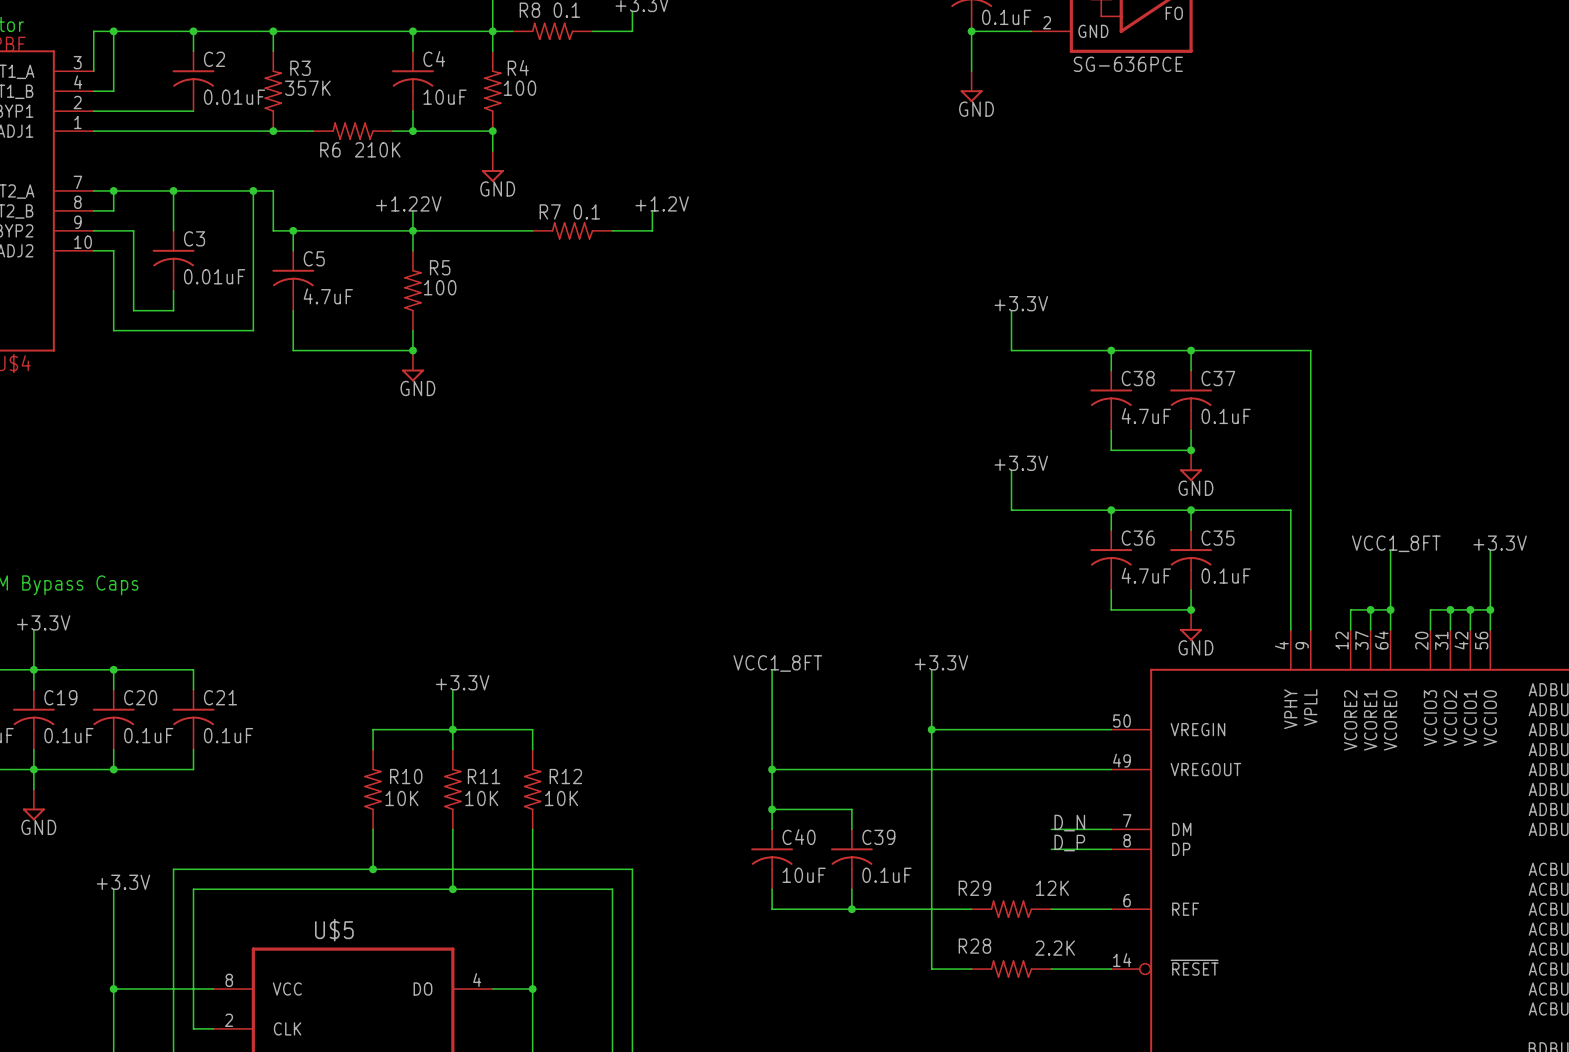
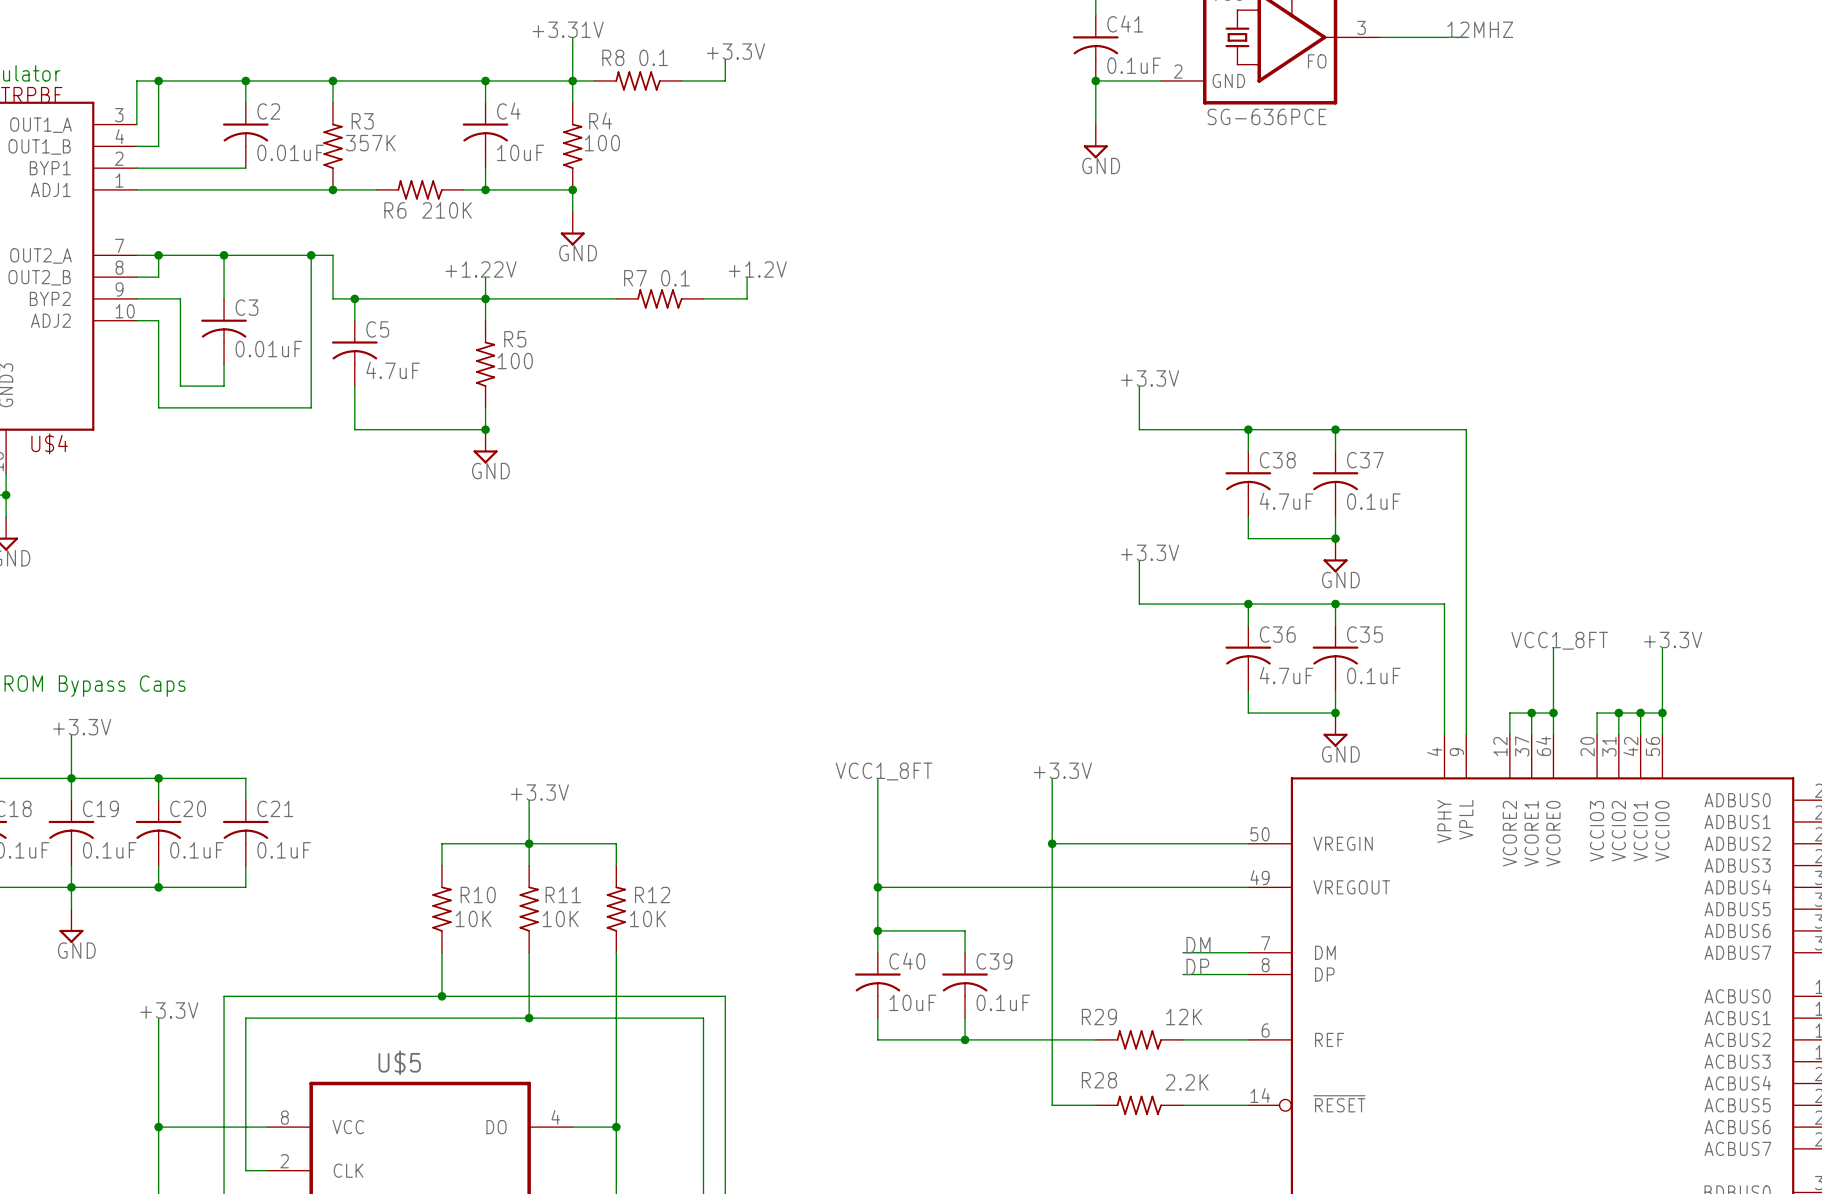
label: D_N (1069, 823) -> DM (1198, 945)
label: D_P (1069, 843) -> DP (1197, 966)

